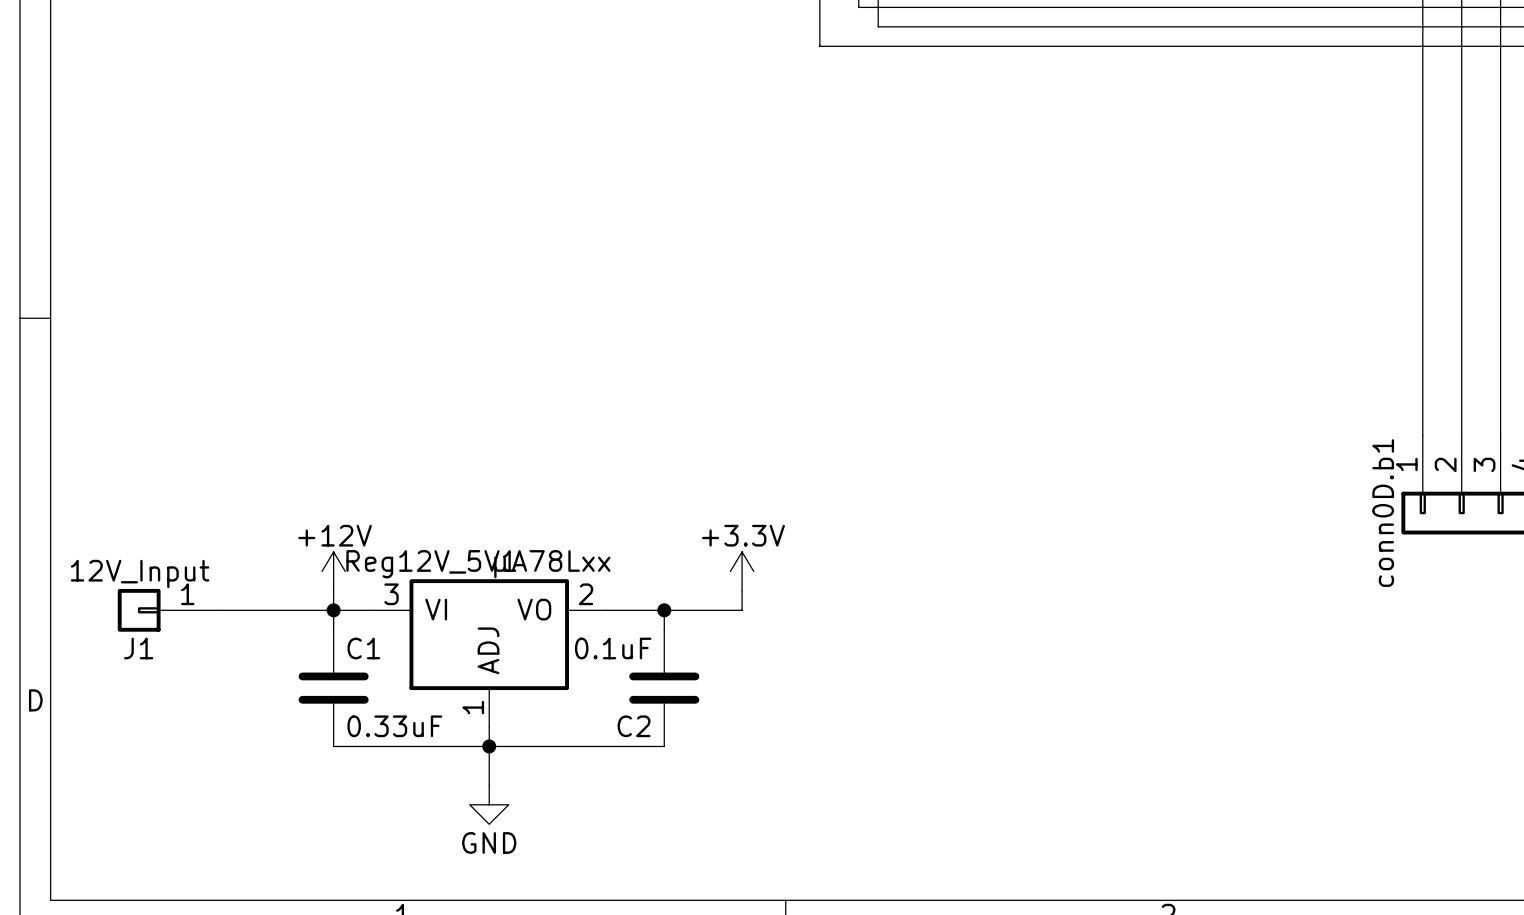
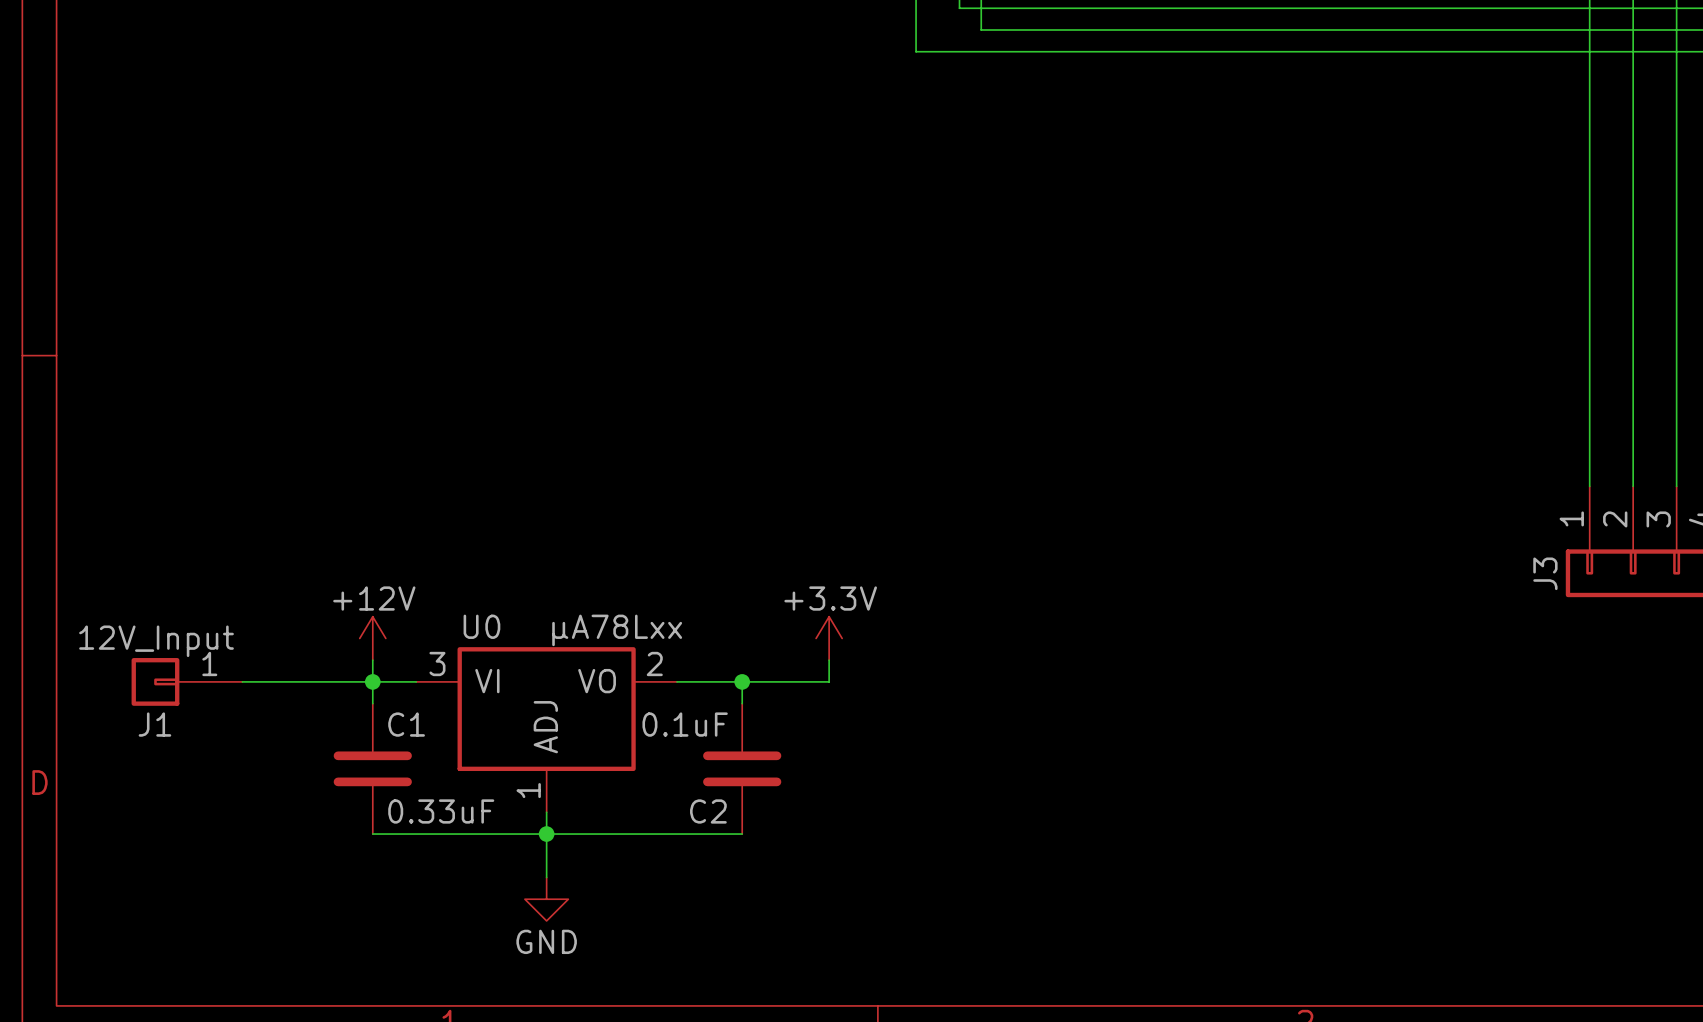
conn0D.b1 name: conn0D.b1 (1383, 513) -> J3 (1545, 573)
Reg12V_5V1 name: Reg12V_5V1 (431, 564) -> U0 (481, 626)

